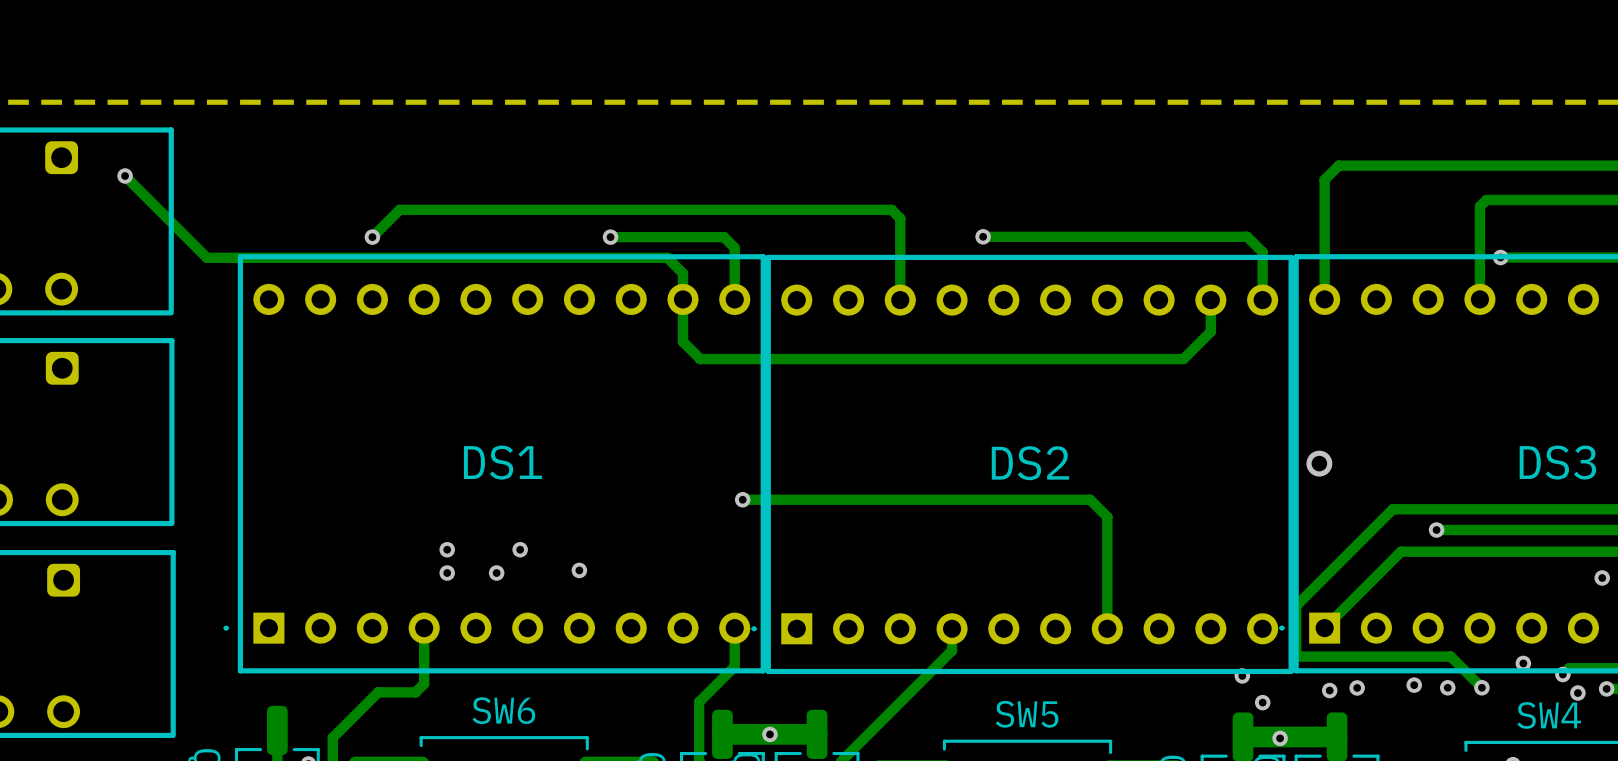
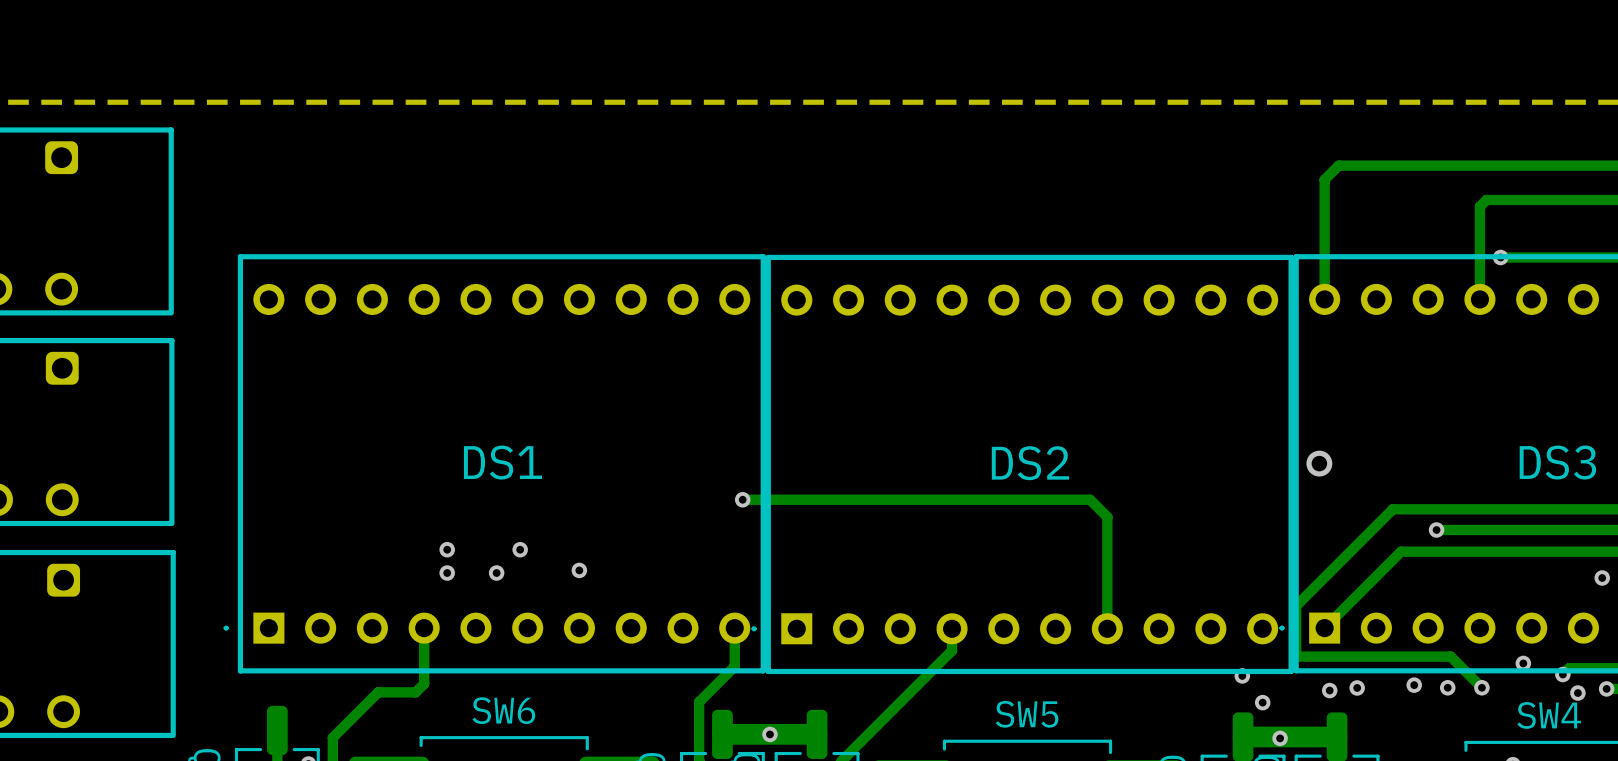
track: (125, 175) (206, 257) (667, 257) (682, 273) (682, 341) (700, 359) (1183, 359) (1210, 331) (1210, 300) -> none
via: (125, 175) -> none
track: (983, 236) (1247, 236) (1262, 252) (1262, 300) -> none
via: (983, 236) -> none
track: (372, 237) (399, 209) (891, 209) (900, 218) (900, 300) -> none
via: (372, 237) -> none
track: (610, 237) (723, 237) (734, 247) (734, 299) -> none
via: (610, 237) -> none

